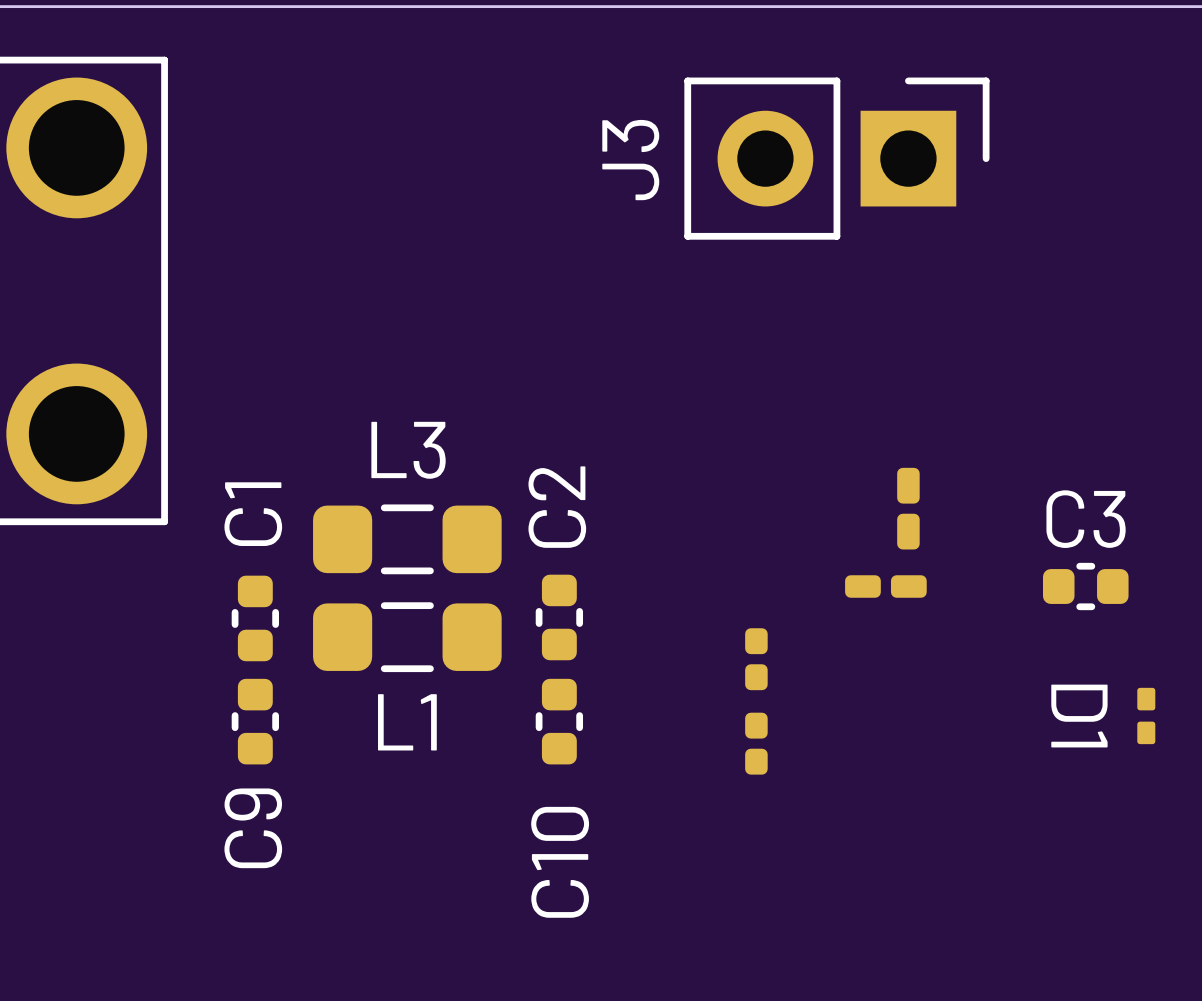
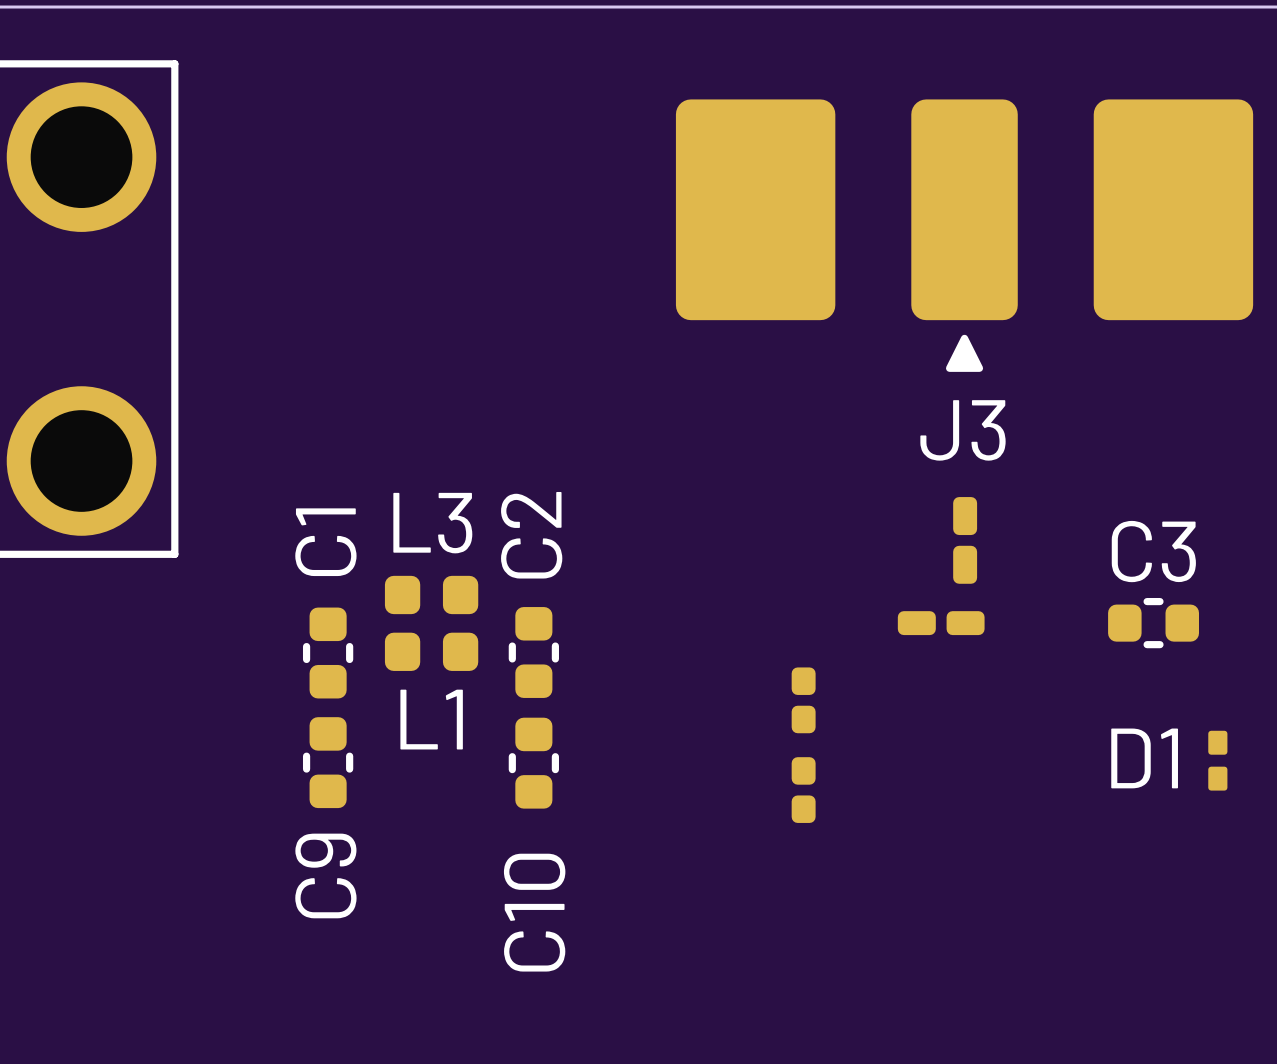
J3 footprint: [684, 77, 990, 240] -> [675, 99, 1254, 372]
J3 name position: J3 (630, 160) -> J3 (962, 430)
L3 footprint: [313, 504, 502, 575] -> [384, 575, 479, 615]
L1 footprint: [313, 602, 502, 673] -> [384, 632, 479, 671]
C2 position: (559, 617) -> (533, 652)
C1 position: (255, 618) -> (328, 653)
D1 name rotation: 0° (1079, 716) -> 90° counterclockwise (1144, 758)
C9 position: (255, 721) -> (328, 762)
C10 position: (559, 721) -> (533, 763)

